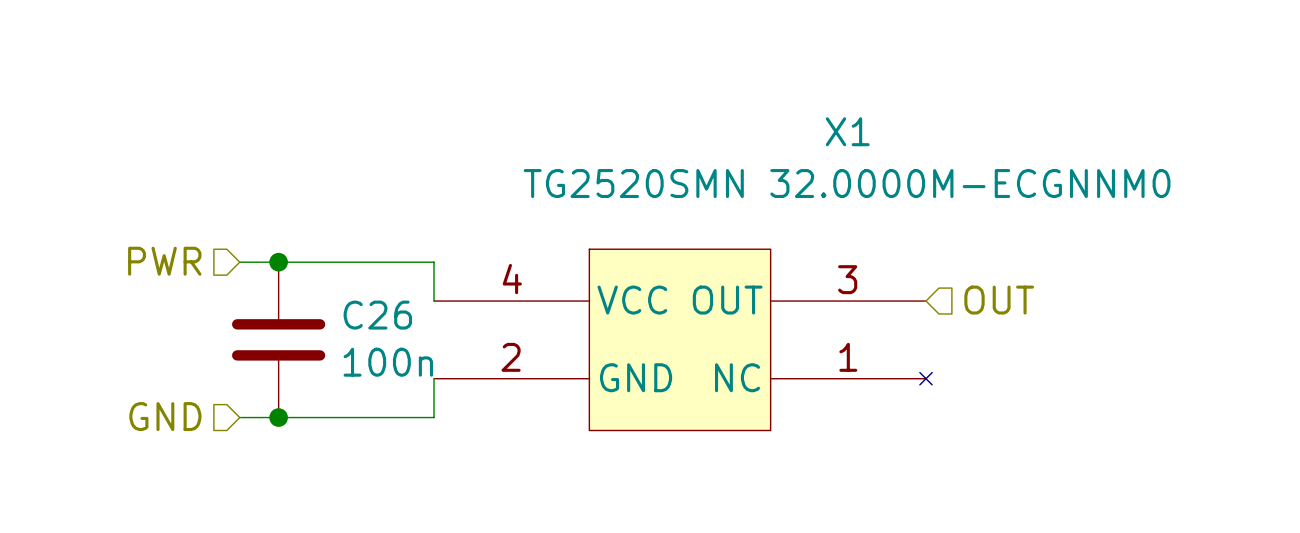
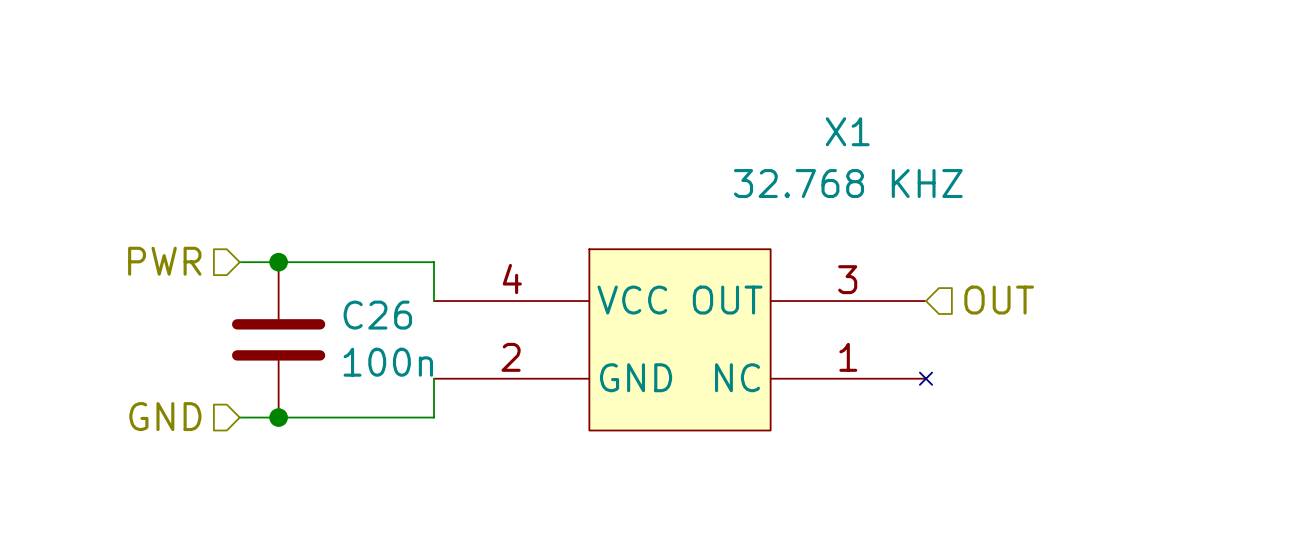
X1 value: TG2520SMN 32.0000M-ECGNNM0 (847, 183) -> 32.768 KHZ (848, 183)

